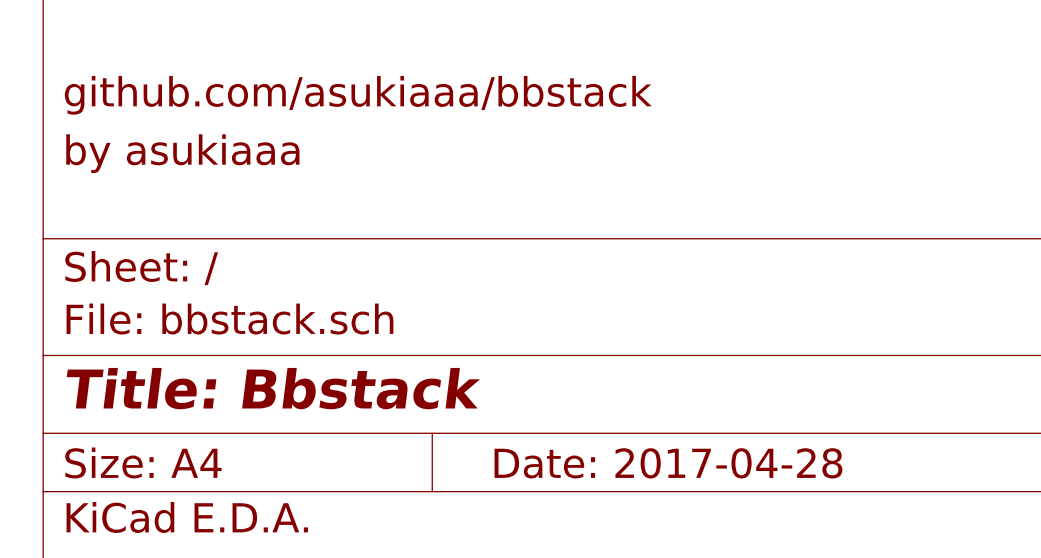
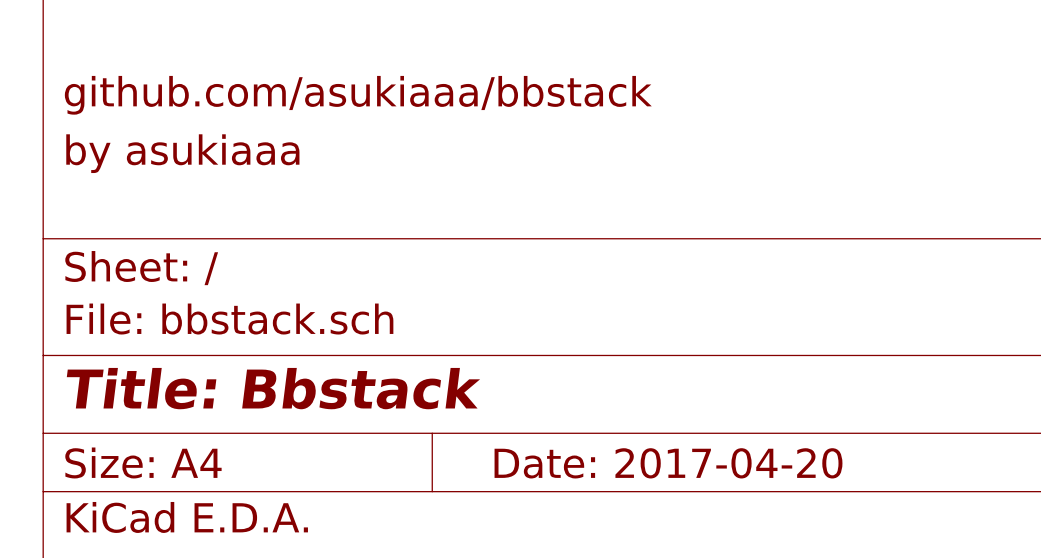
title block: Date: 2017-04-28 (668, 463) -> Date: 2017-04-20 (668, 463)

